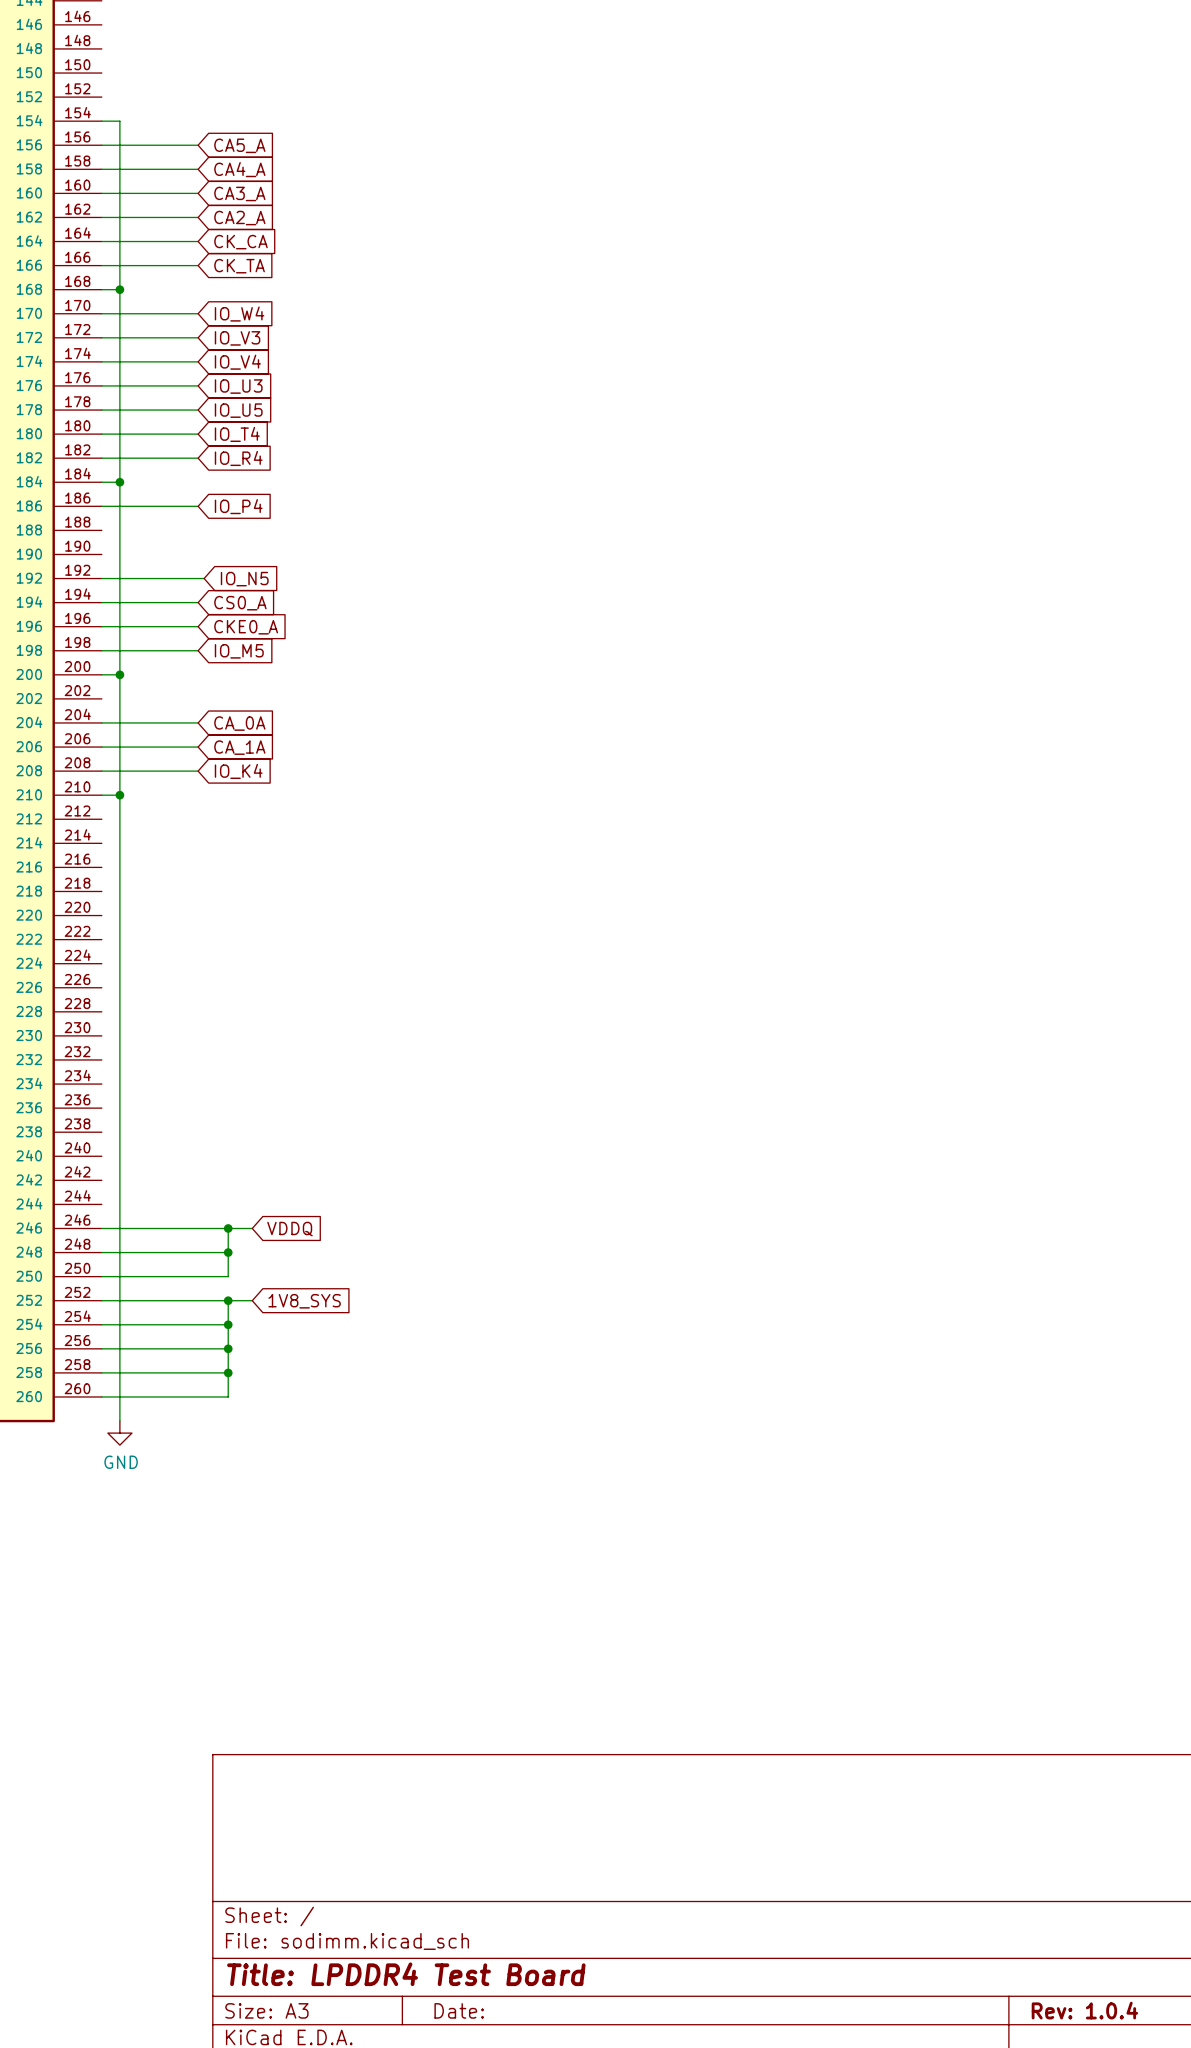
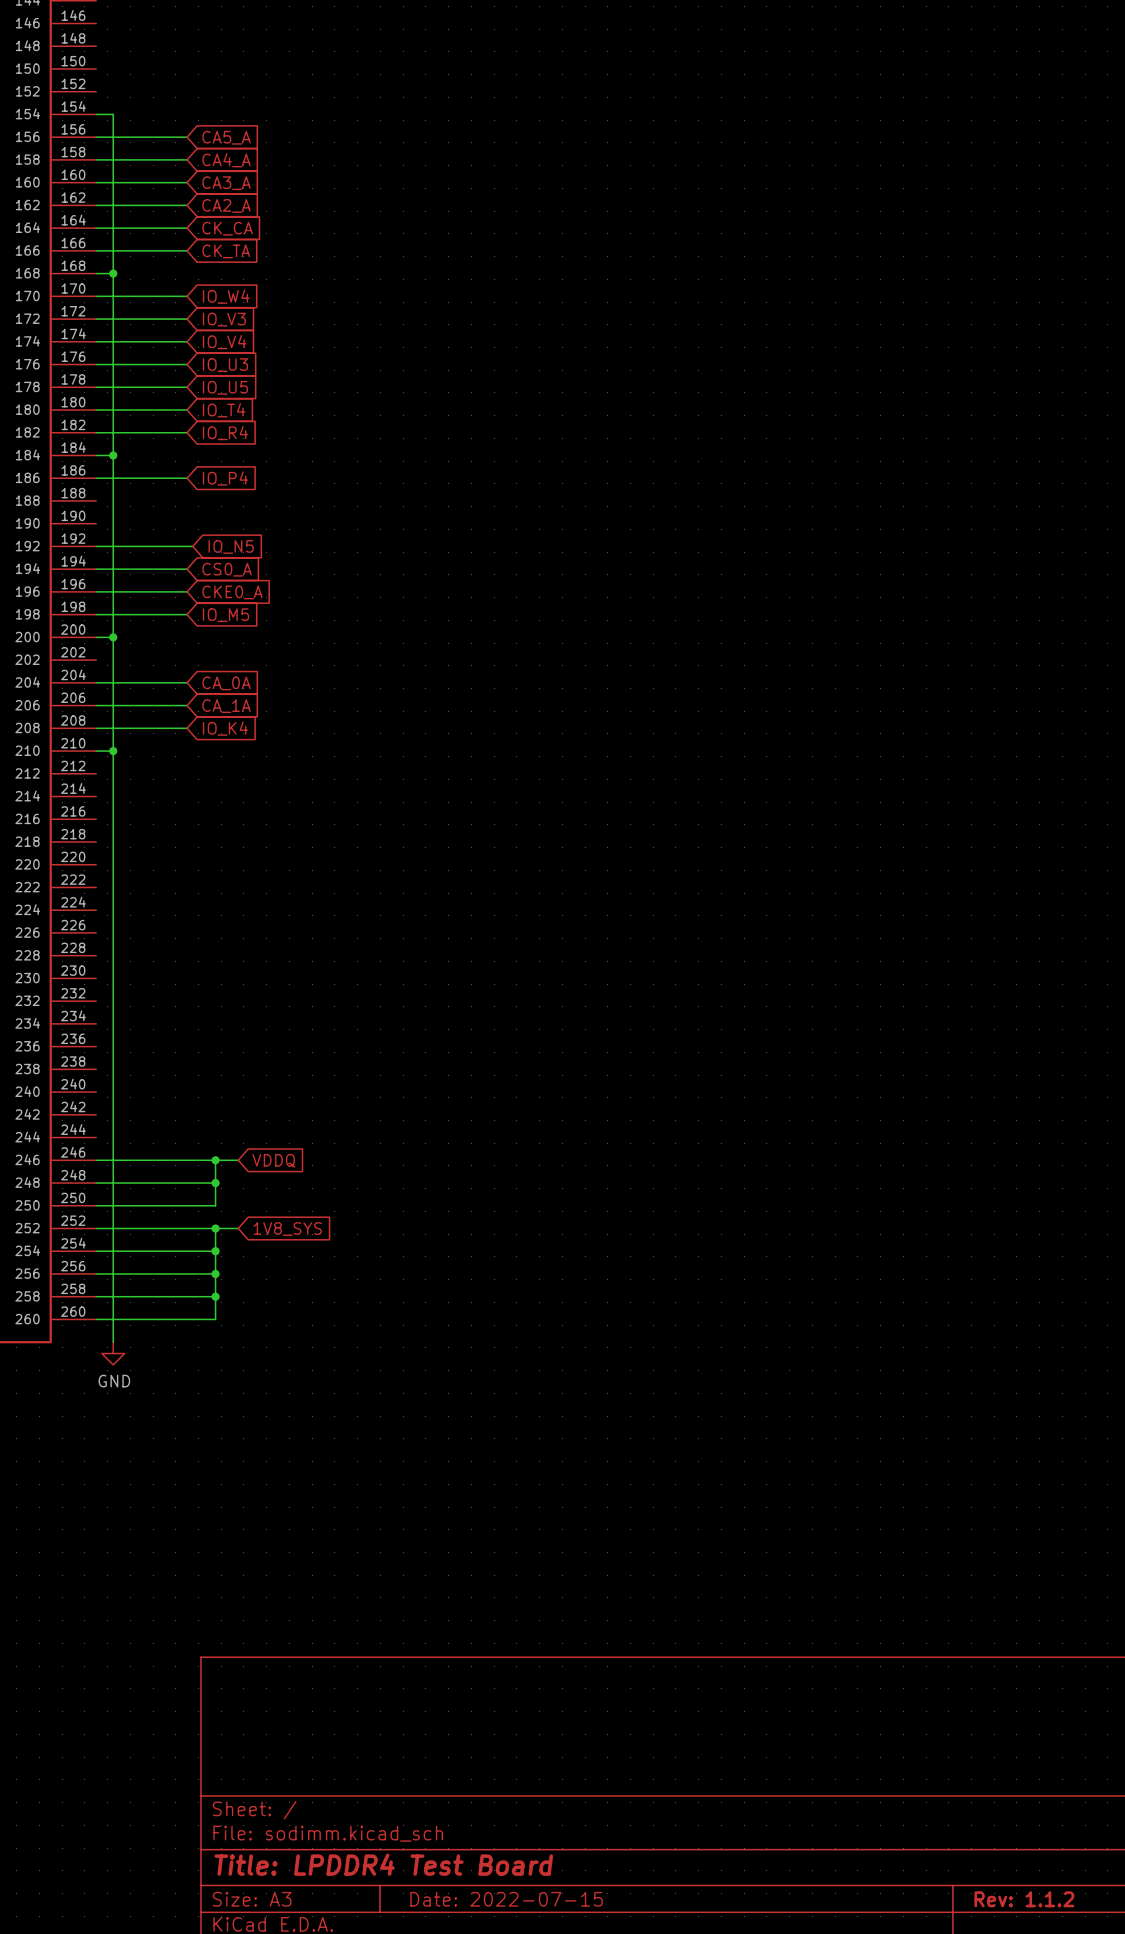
title block: Date: (459, 2010) -> Date: 2022-07-15 (506, 1899)
title block: Rev: 1.0.4 (1084, 2010) -> Rev: 1.1.2 (1024, 1899)

